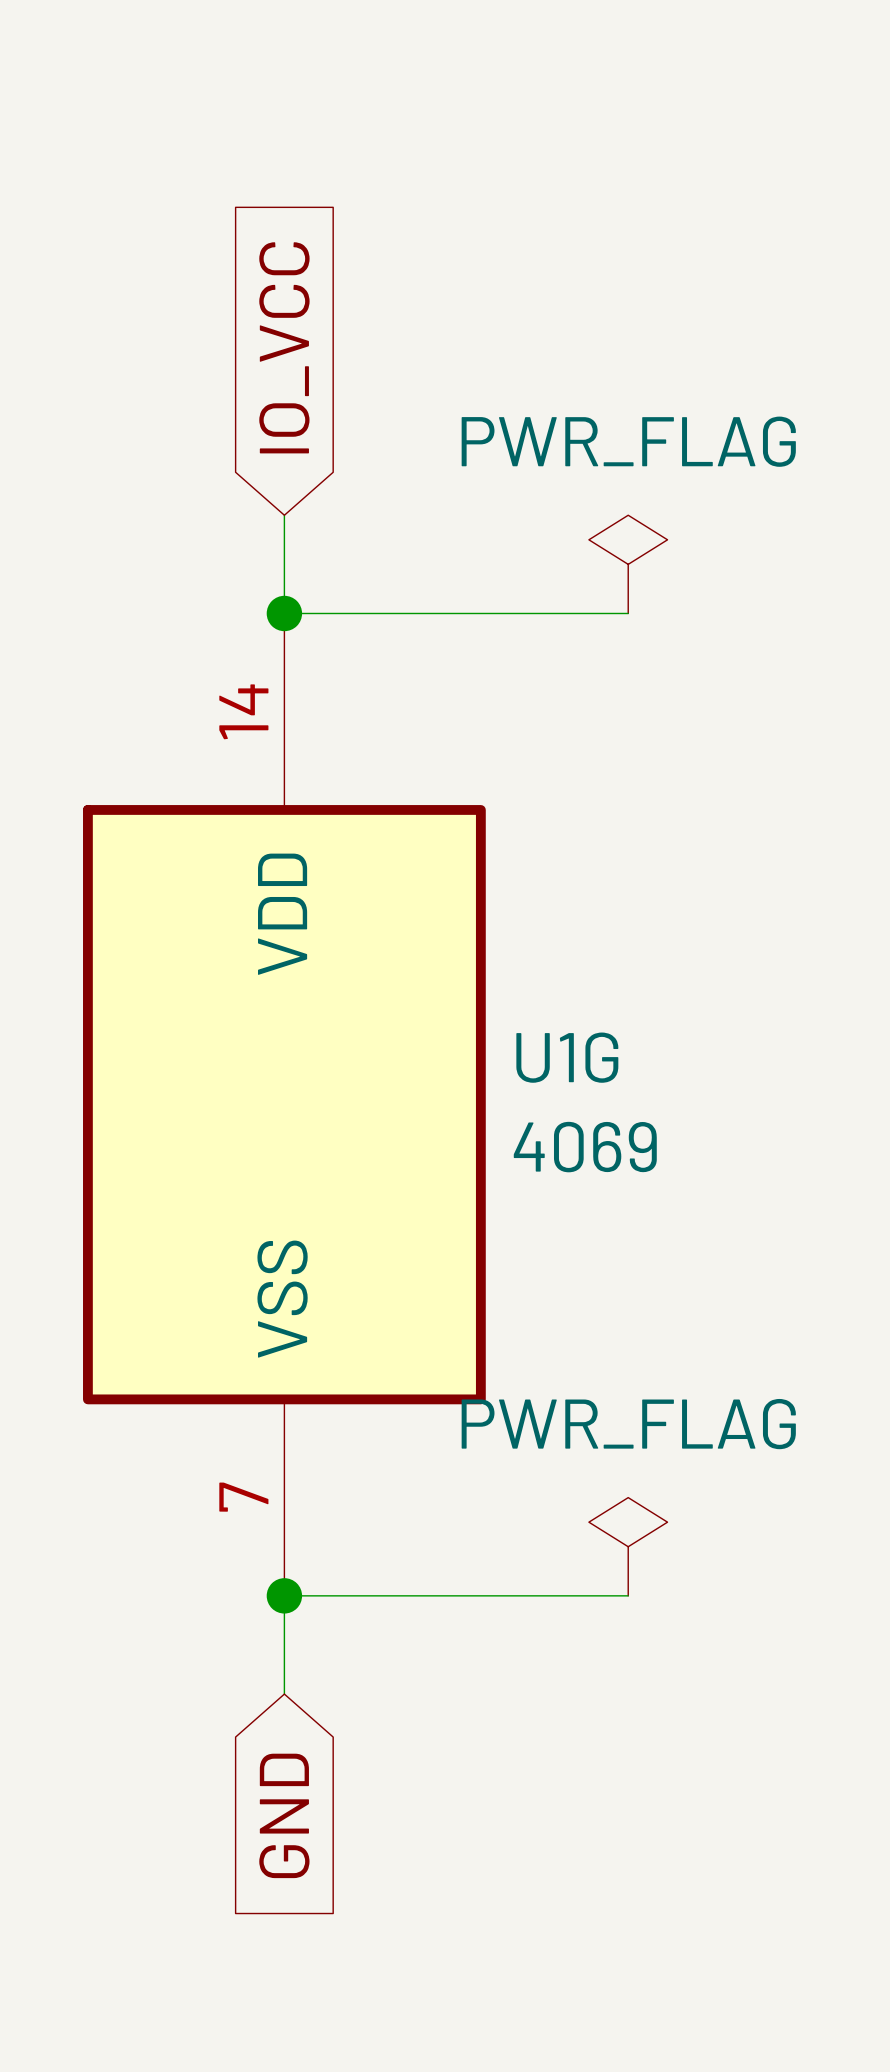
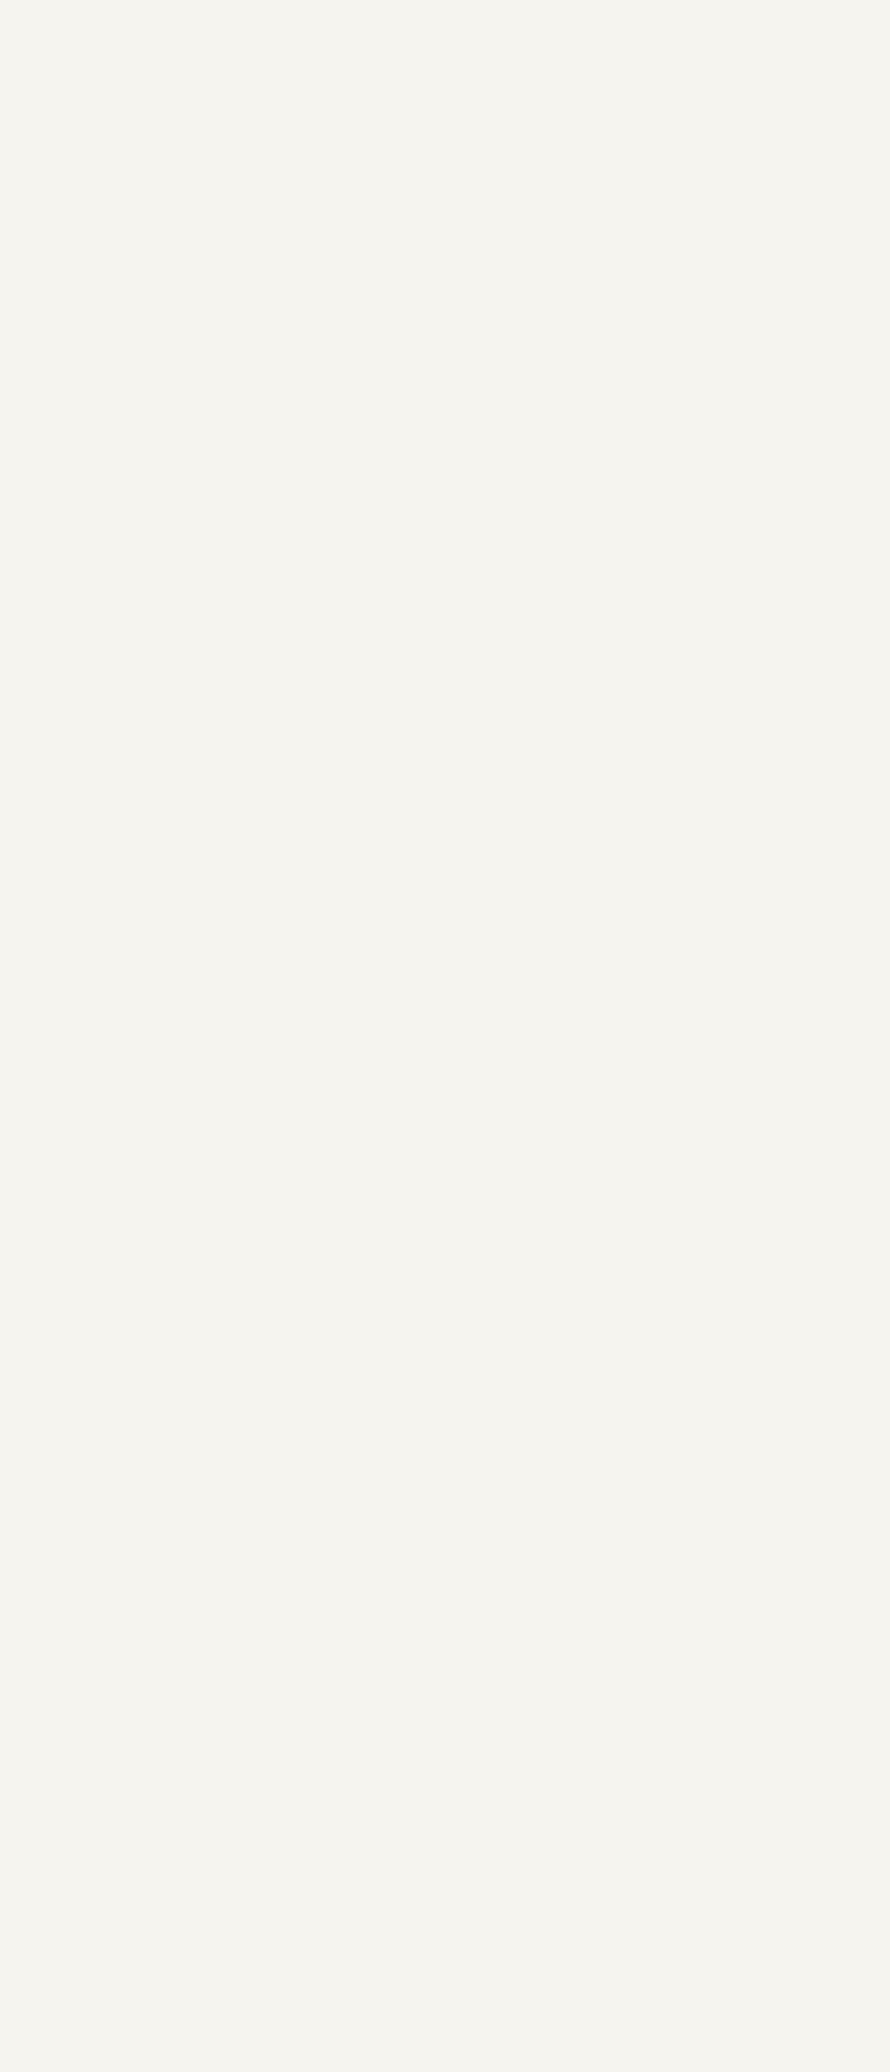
global label: IO_VCC (284, 347) -> none
wire: (284, 515) (284, 613) (628, 613) -> none
power symbol: PWR_FLAG (628, 564) -> none
junction: (284, 613) -> none
U1G: 4069 (284, 1104) -> none
power symbol: PWR_FLAG (628, 1546) -> none
junction: (284, 1595) -> none
wire: (628, 1595) (284, 1595) (284, 1694) -> none
global label: GND (284, 1815) -> none

